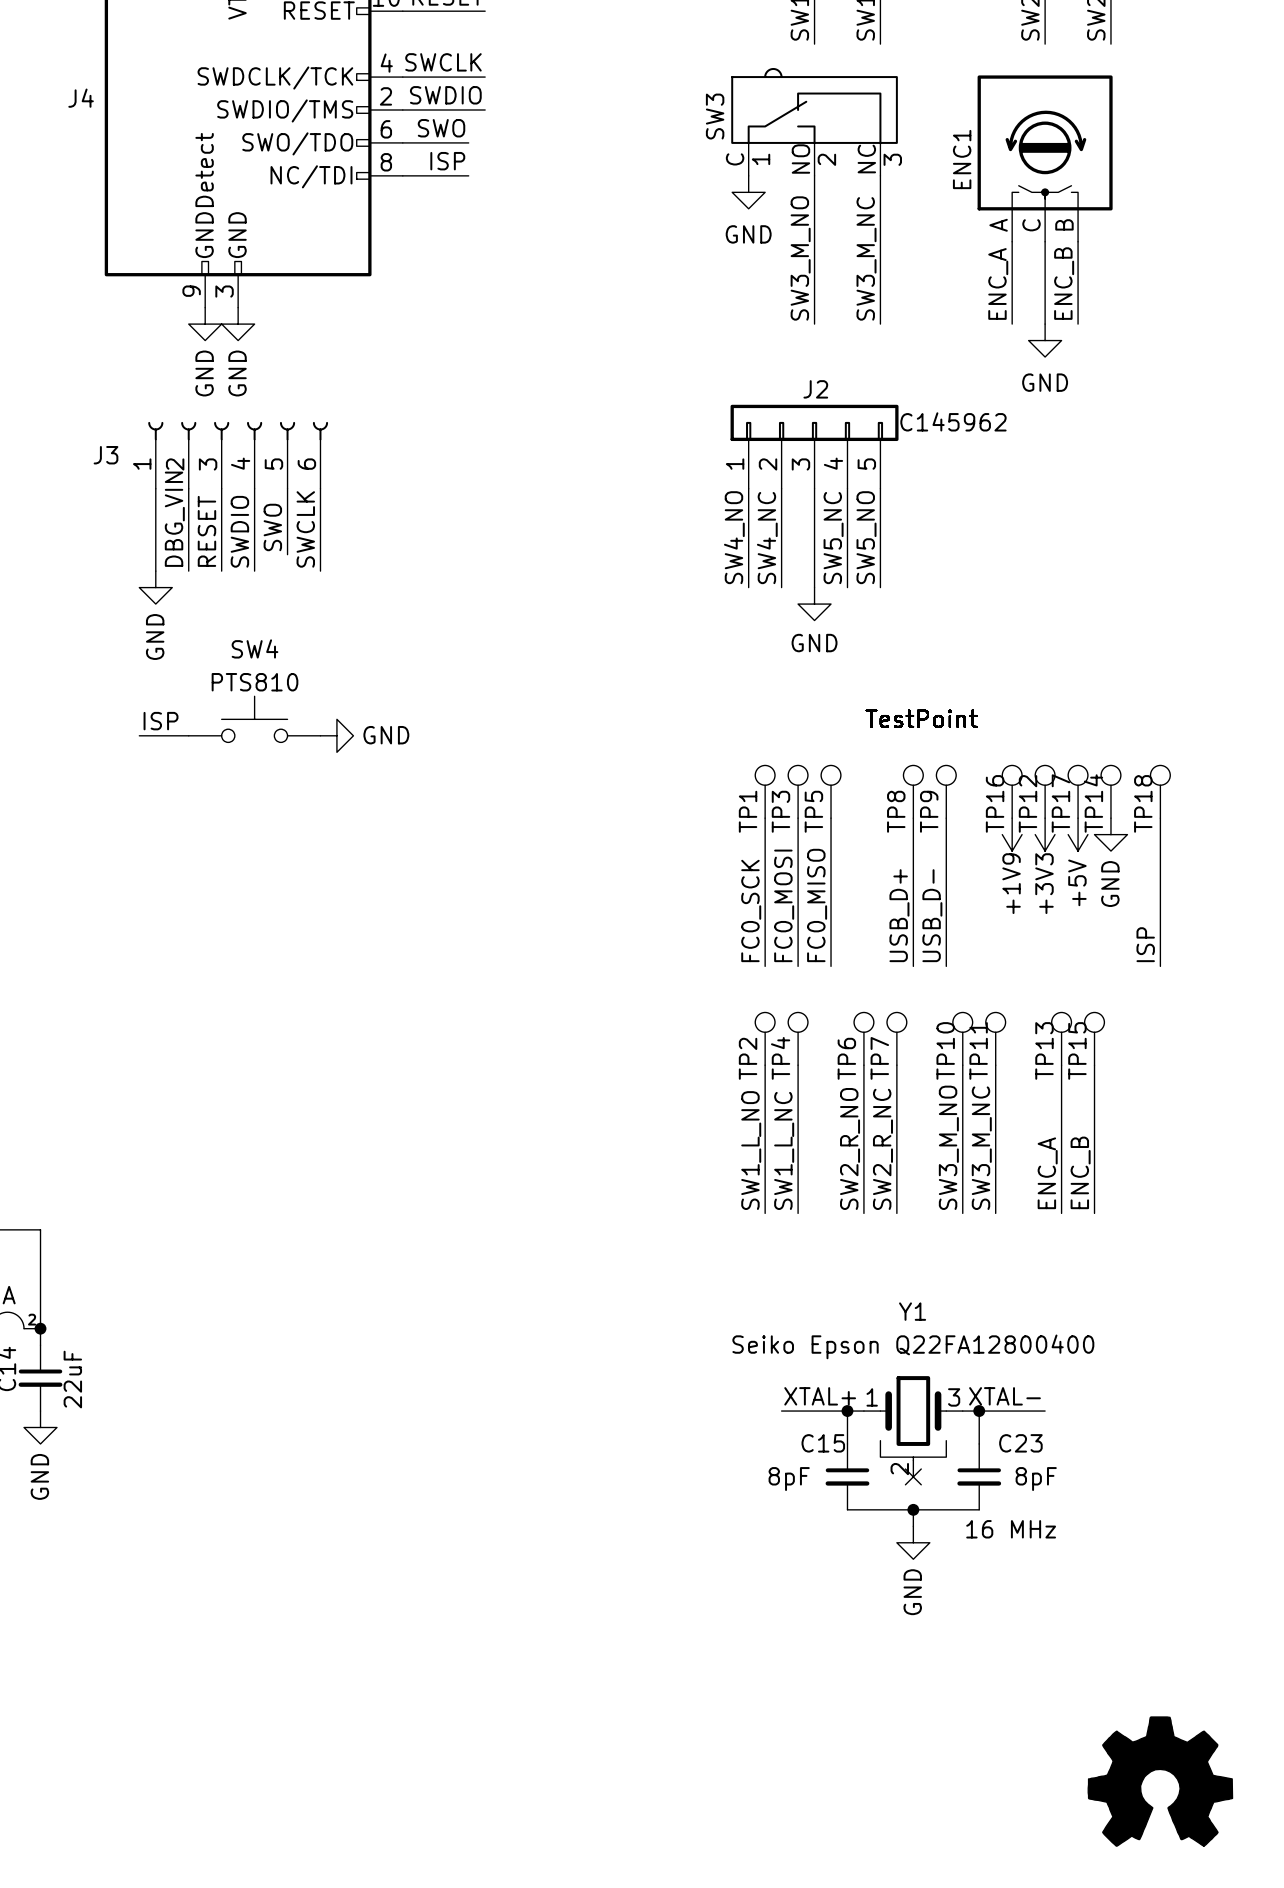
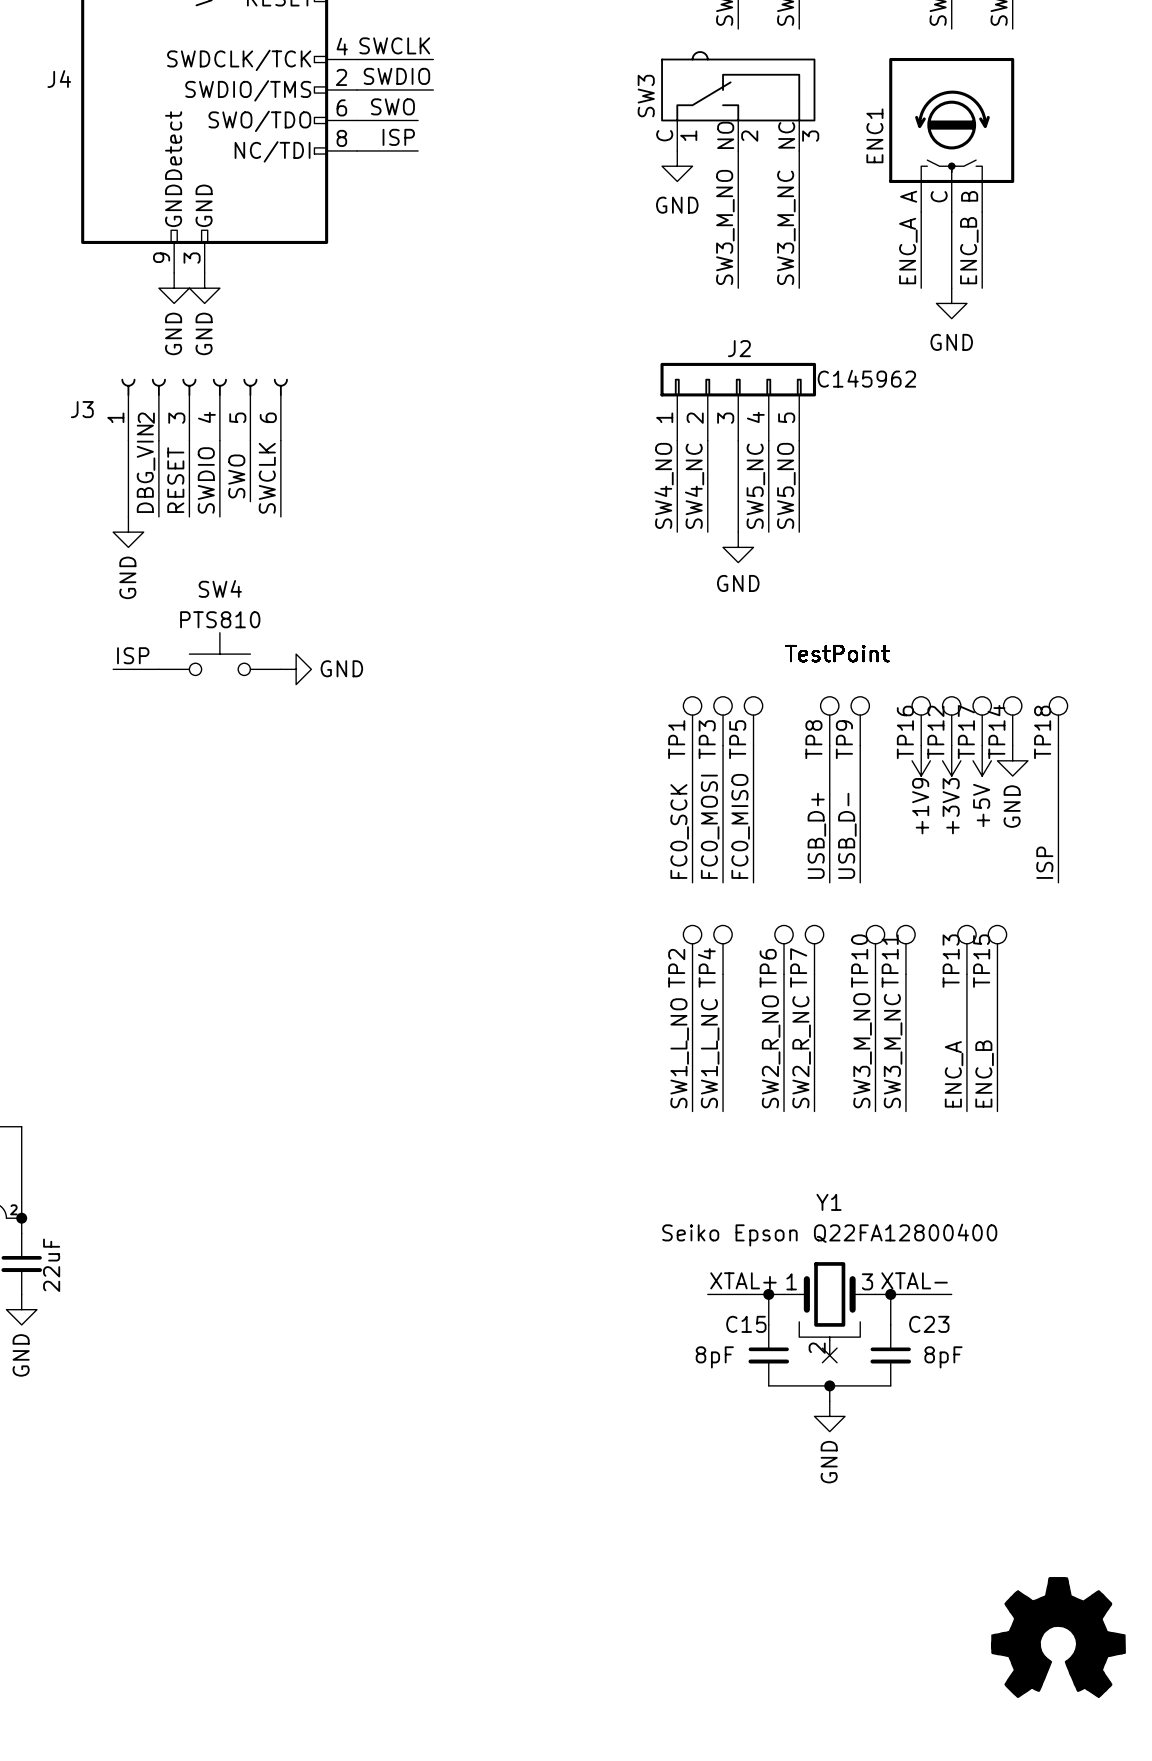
text: 16 MHz (1011, 1529) -> none

